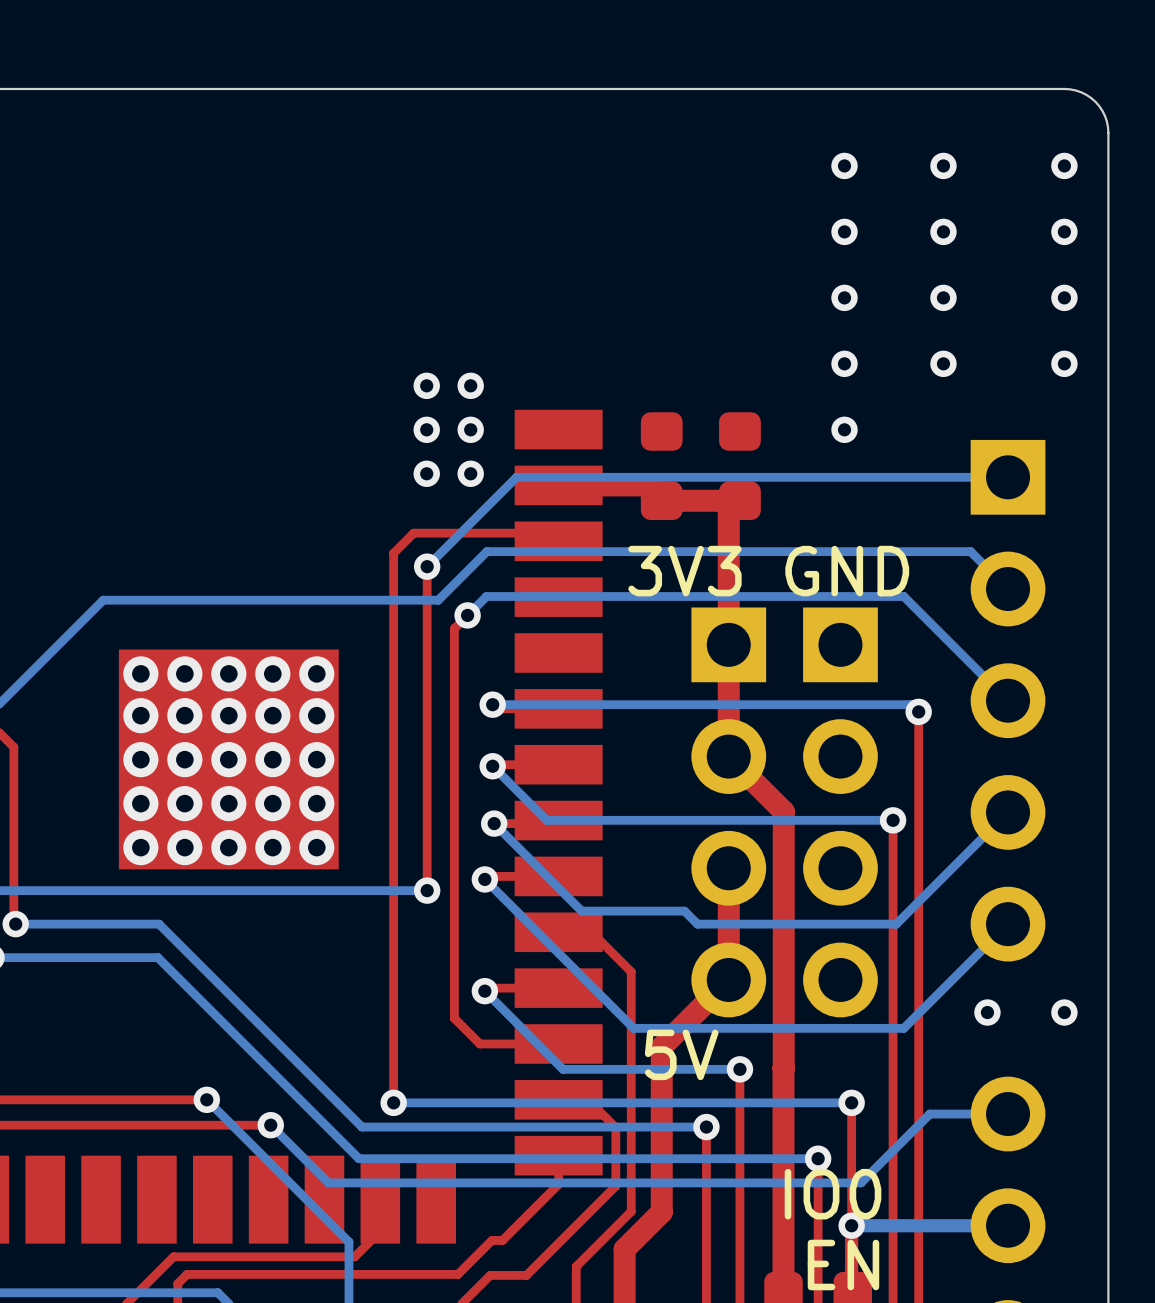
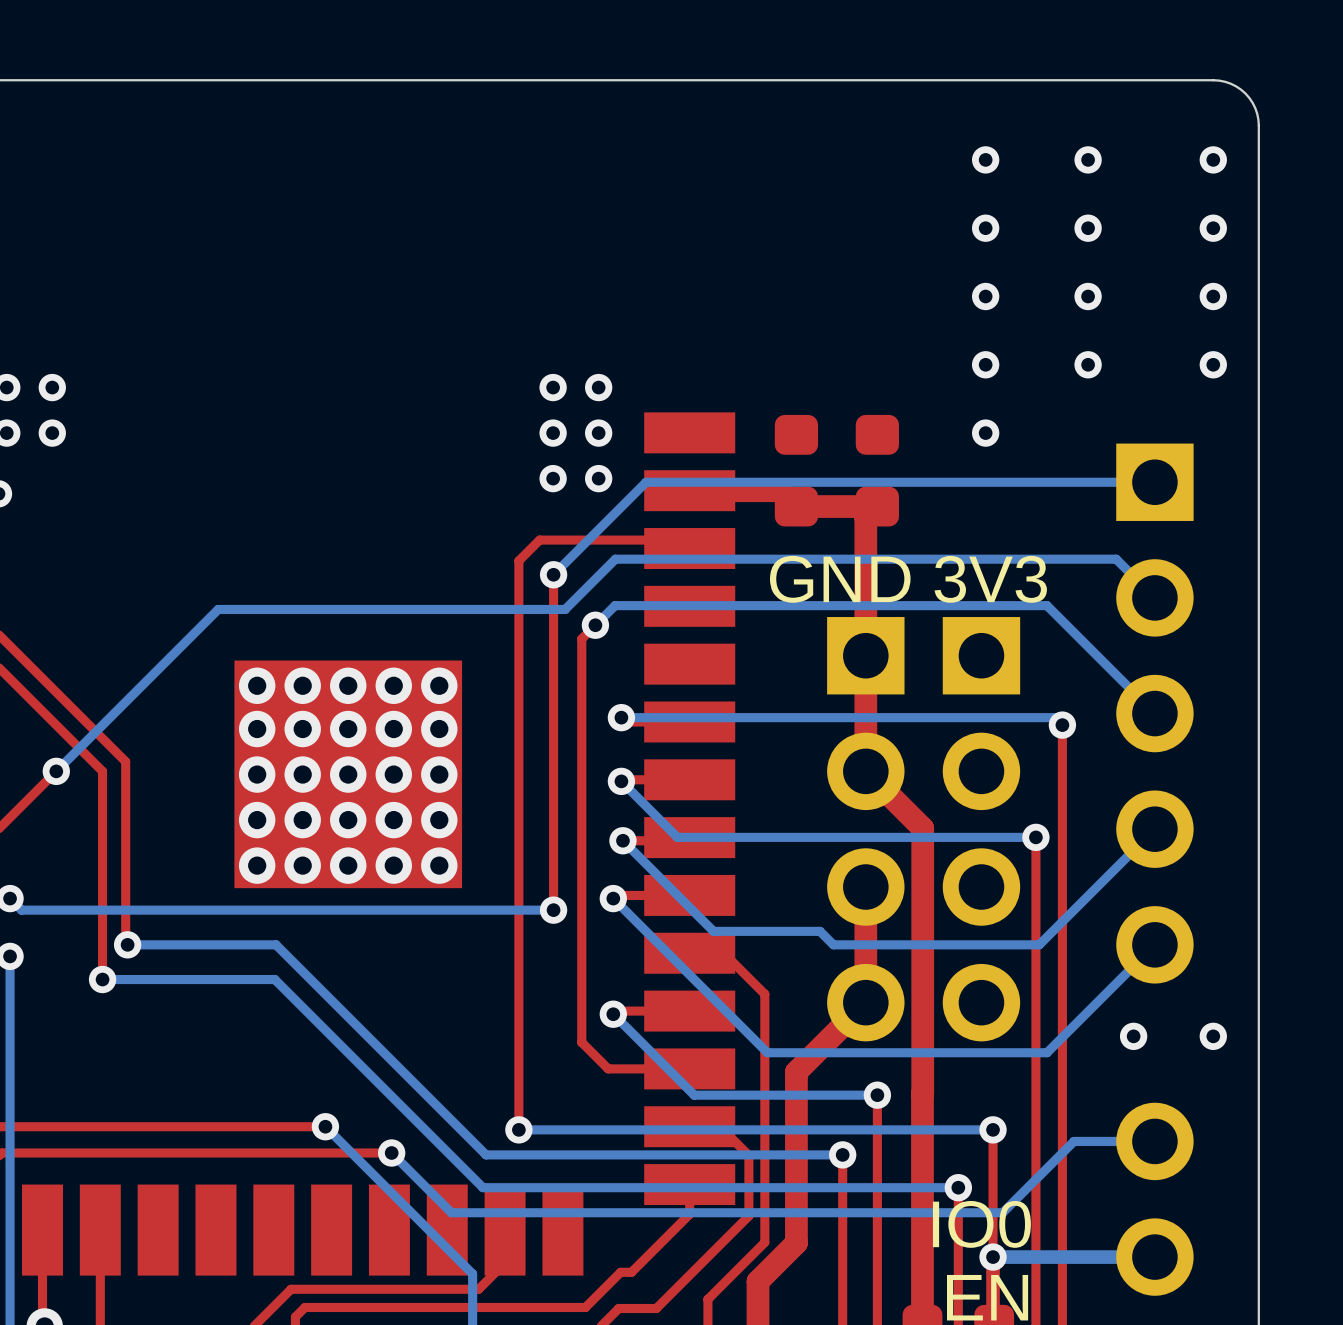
text: 3V3 GND (768, 571) -> GND 3V3 (908, 579)
text: 5V (681, 1054) -> none

